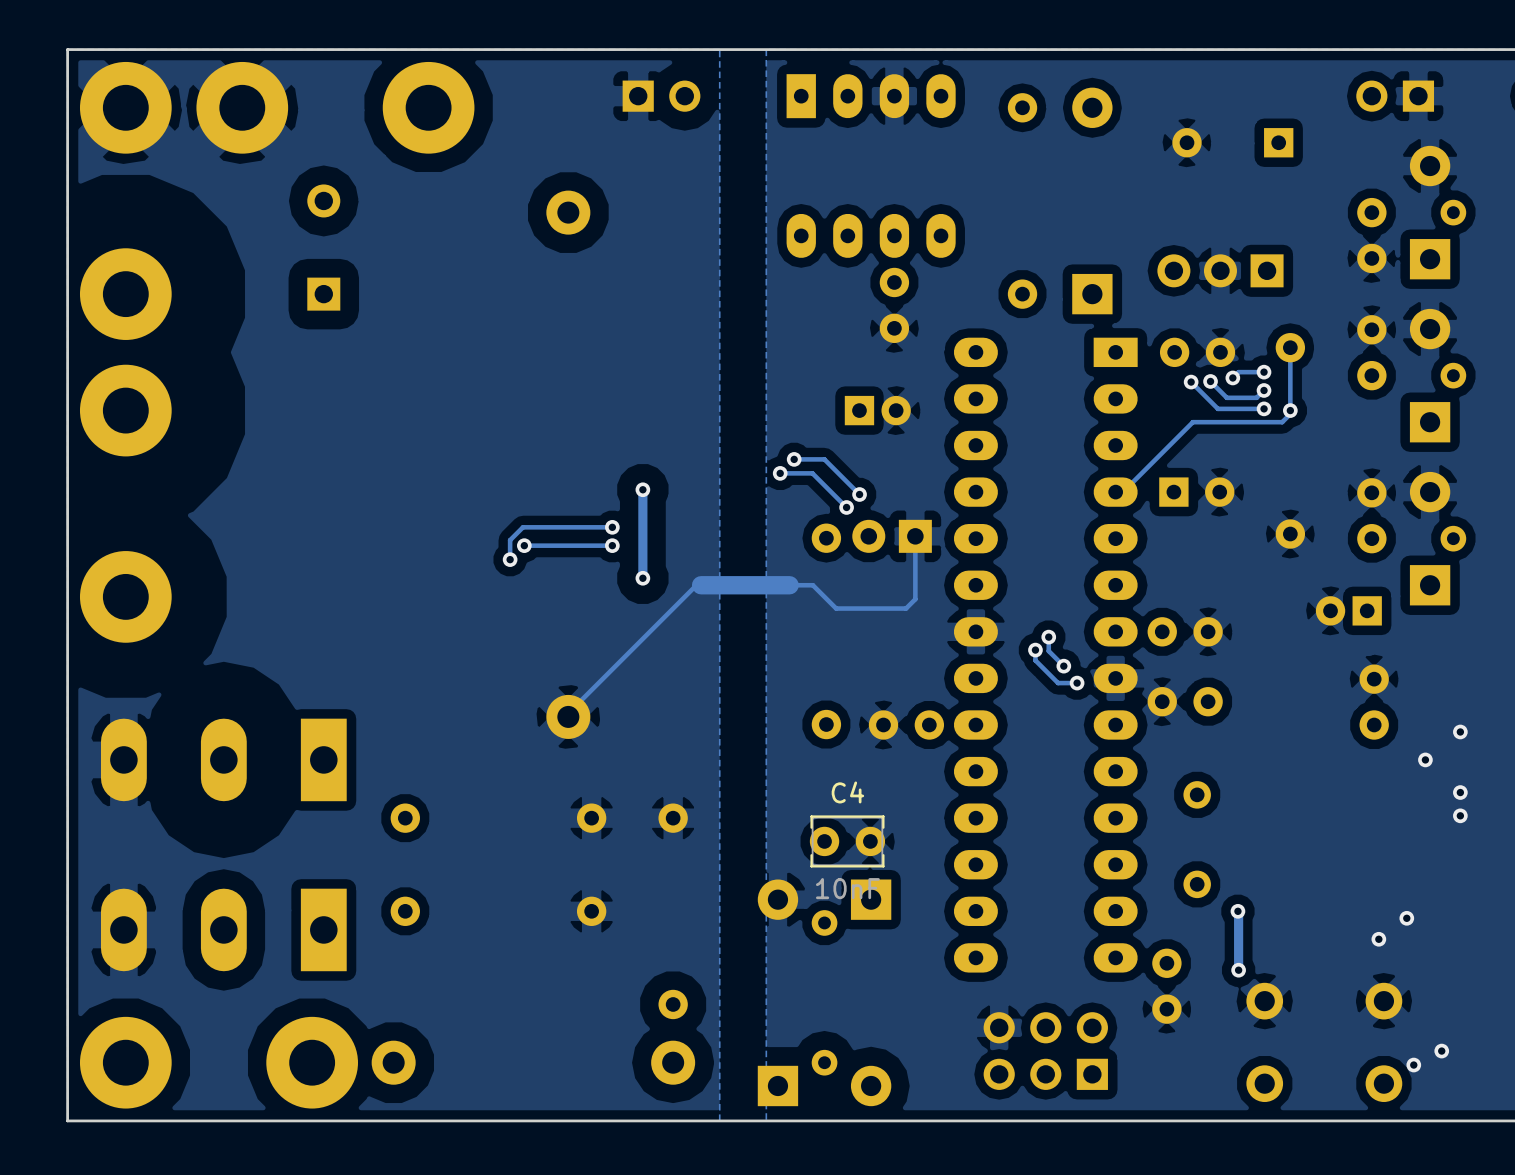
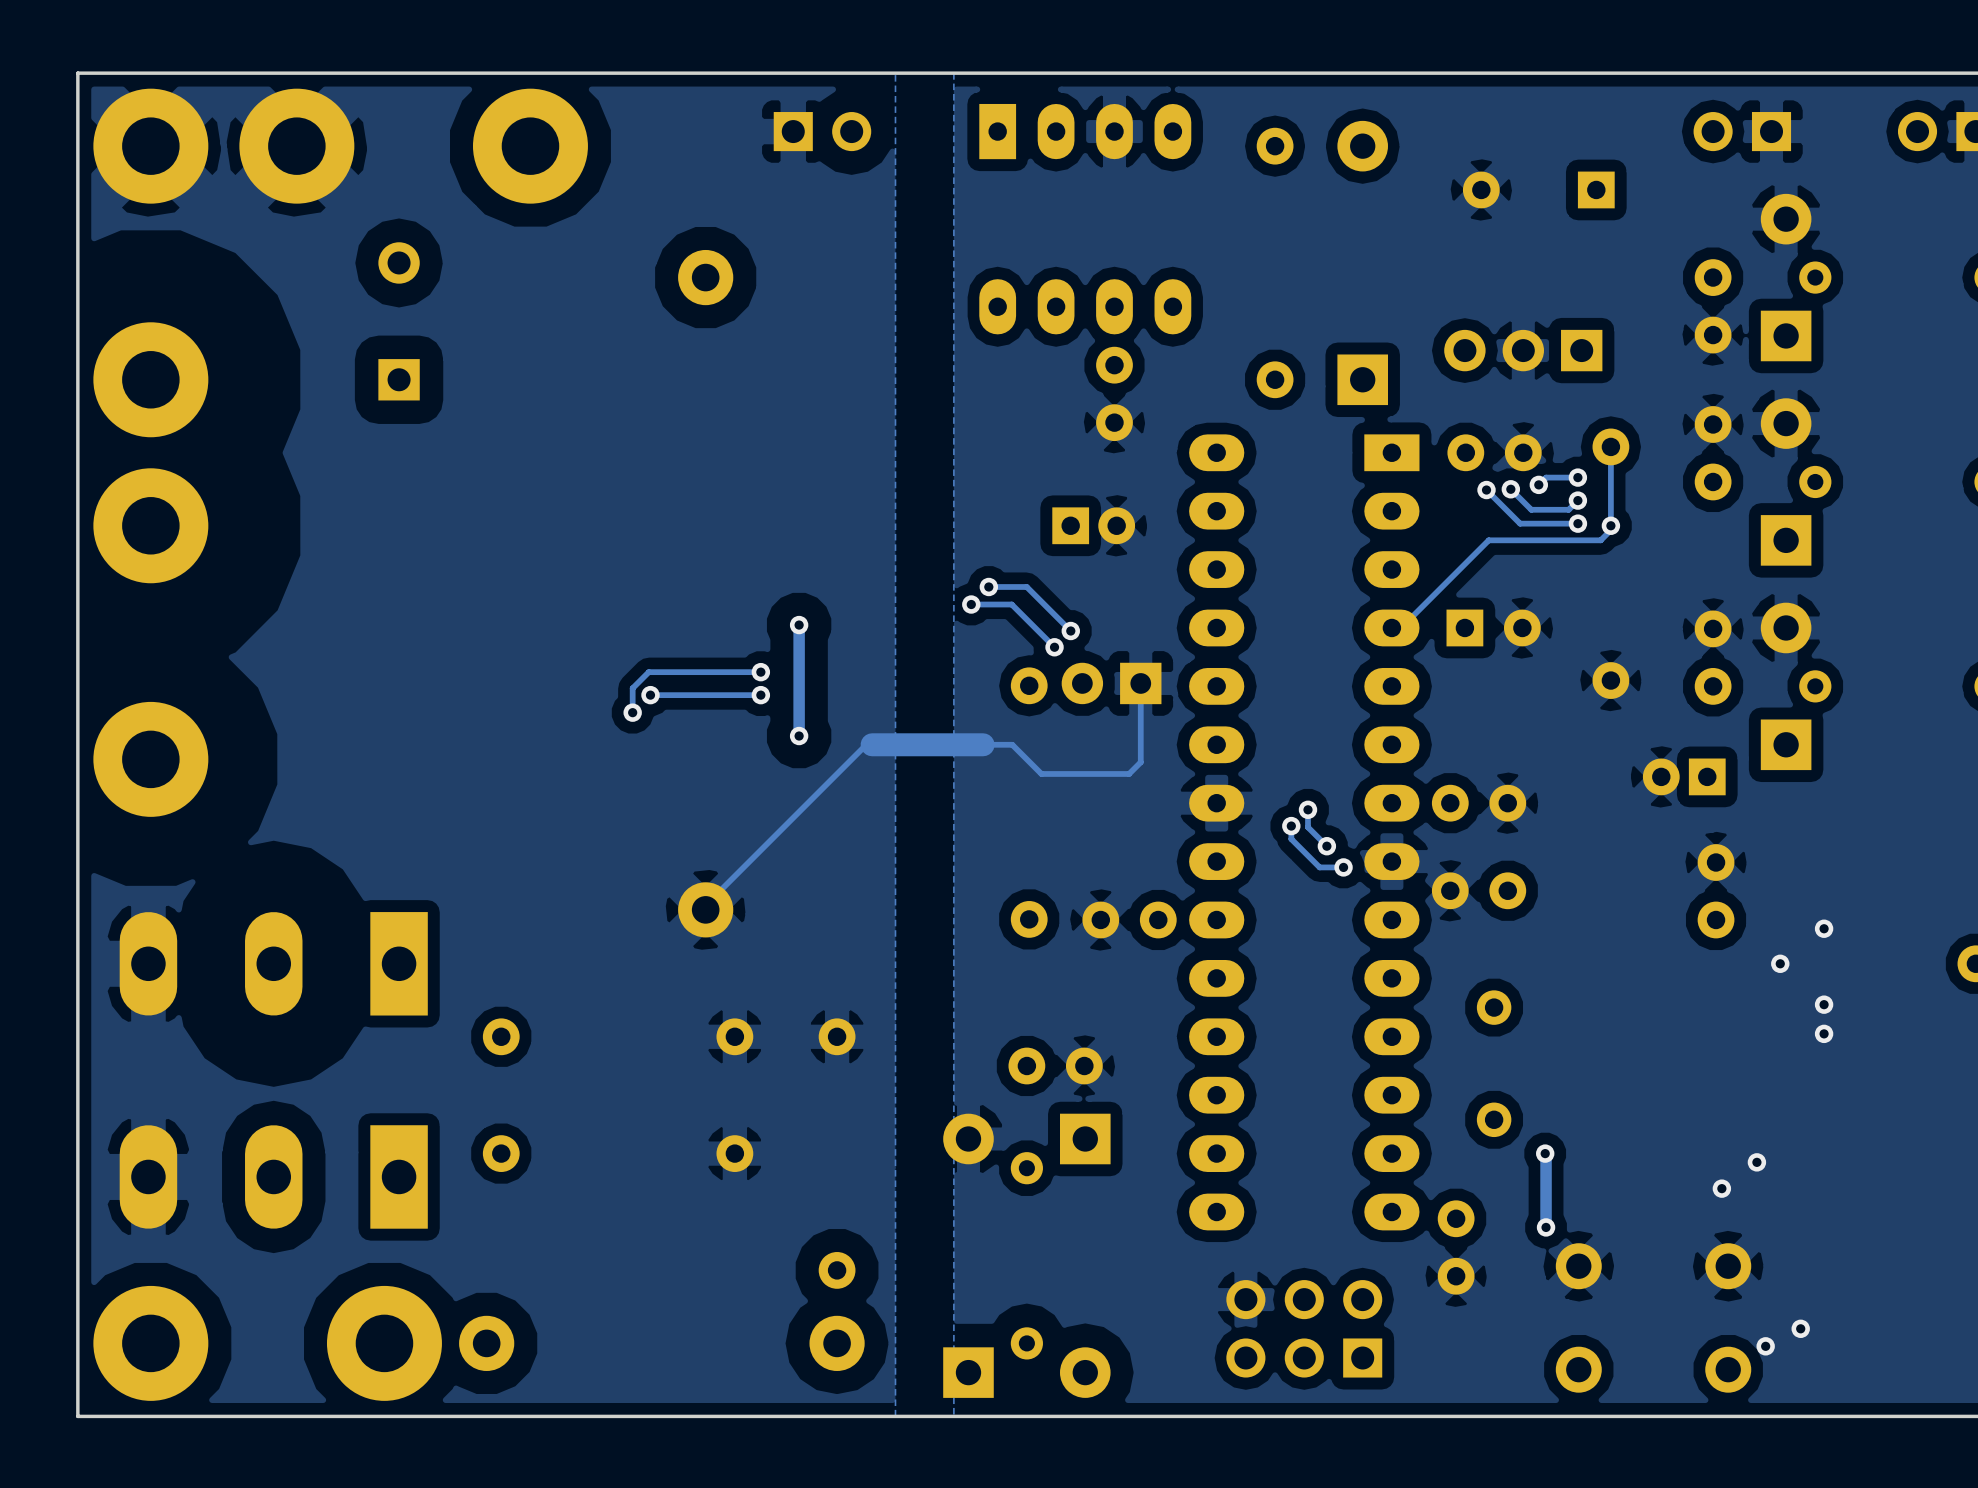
C4 side: bottom (847, 841) -> top (1055, 1065)

